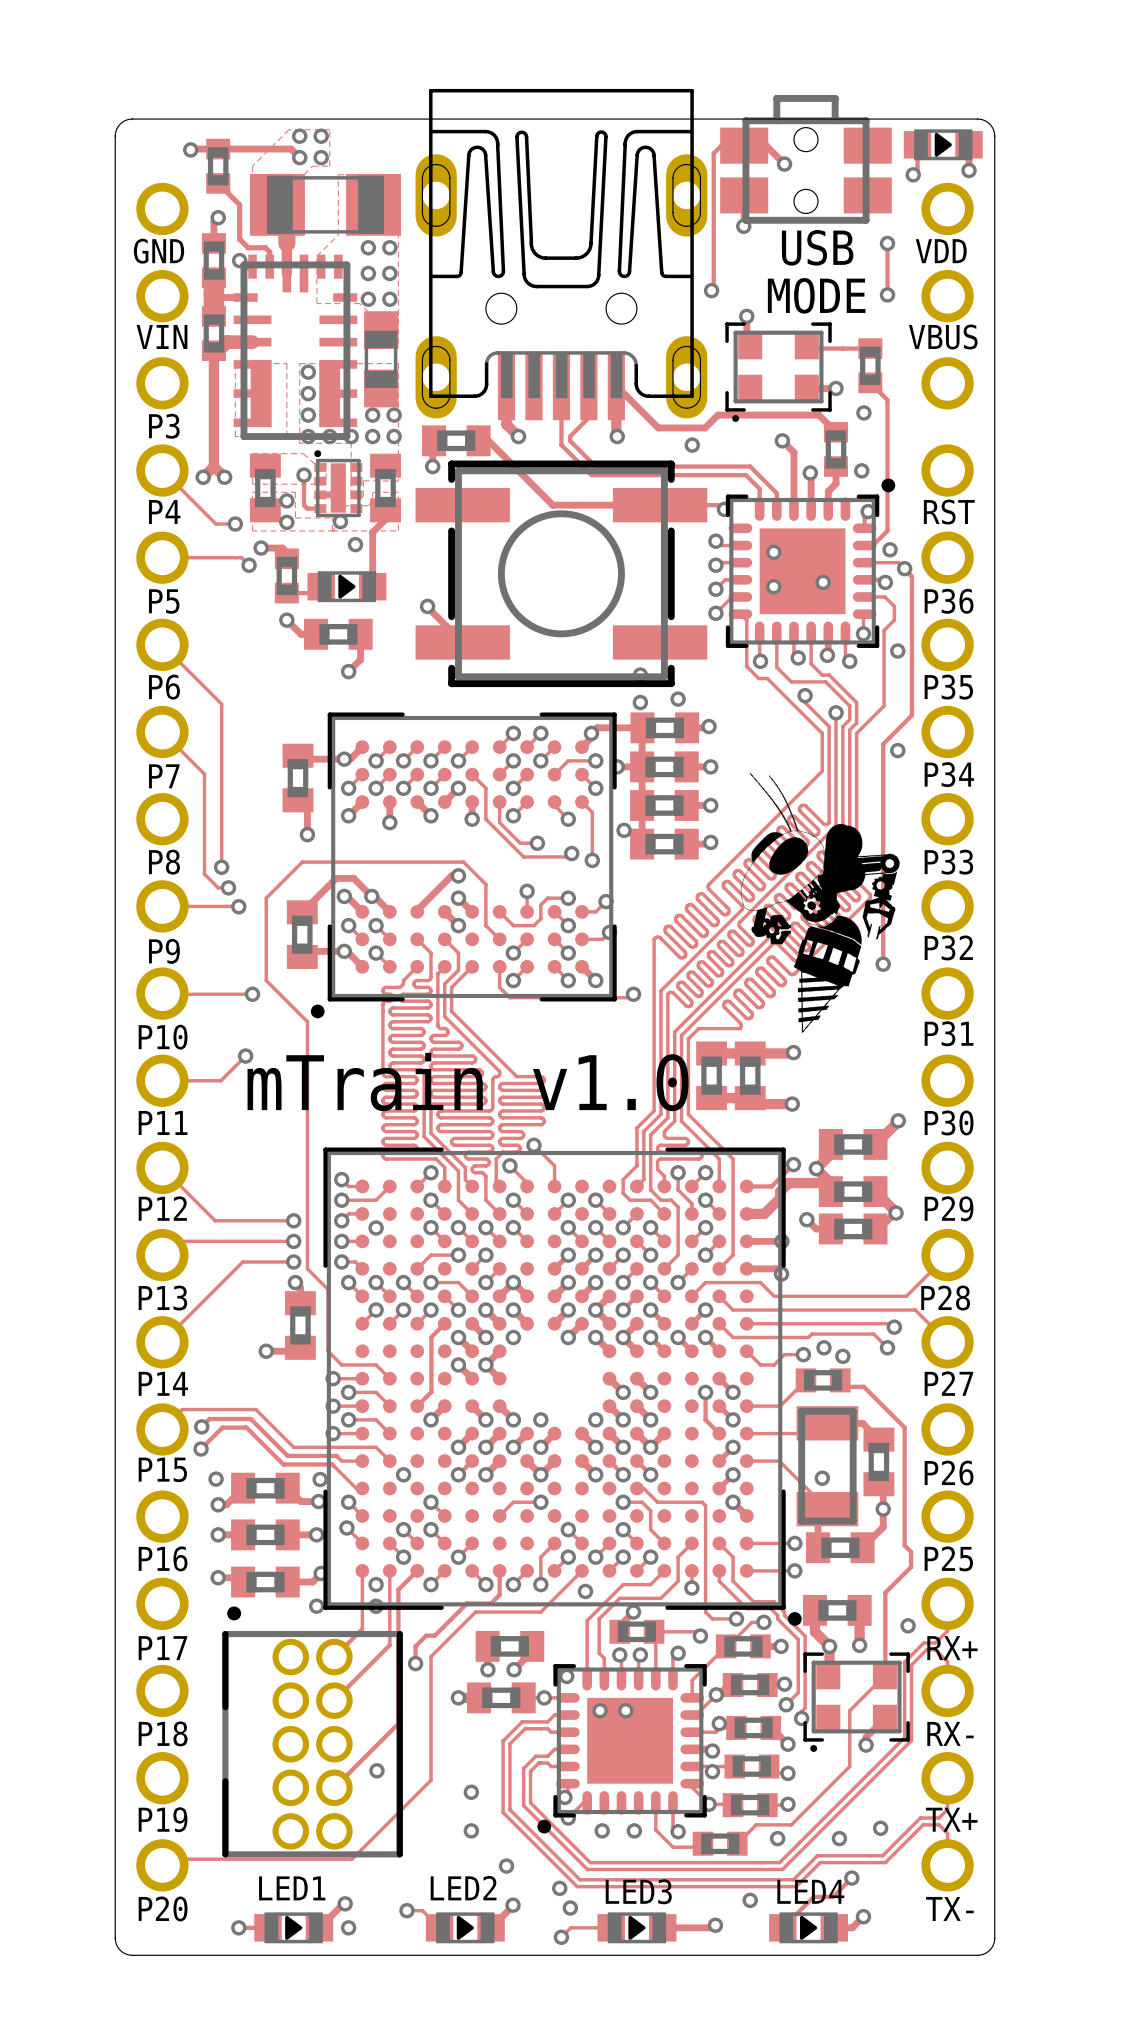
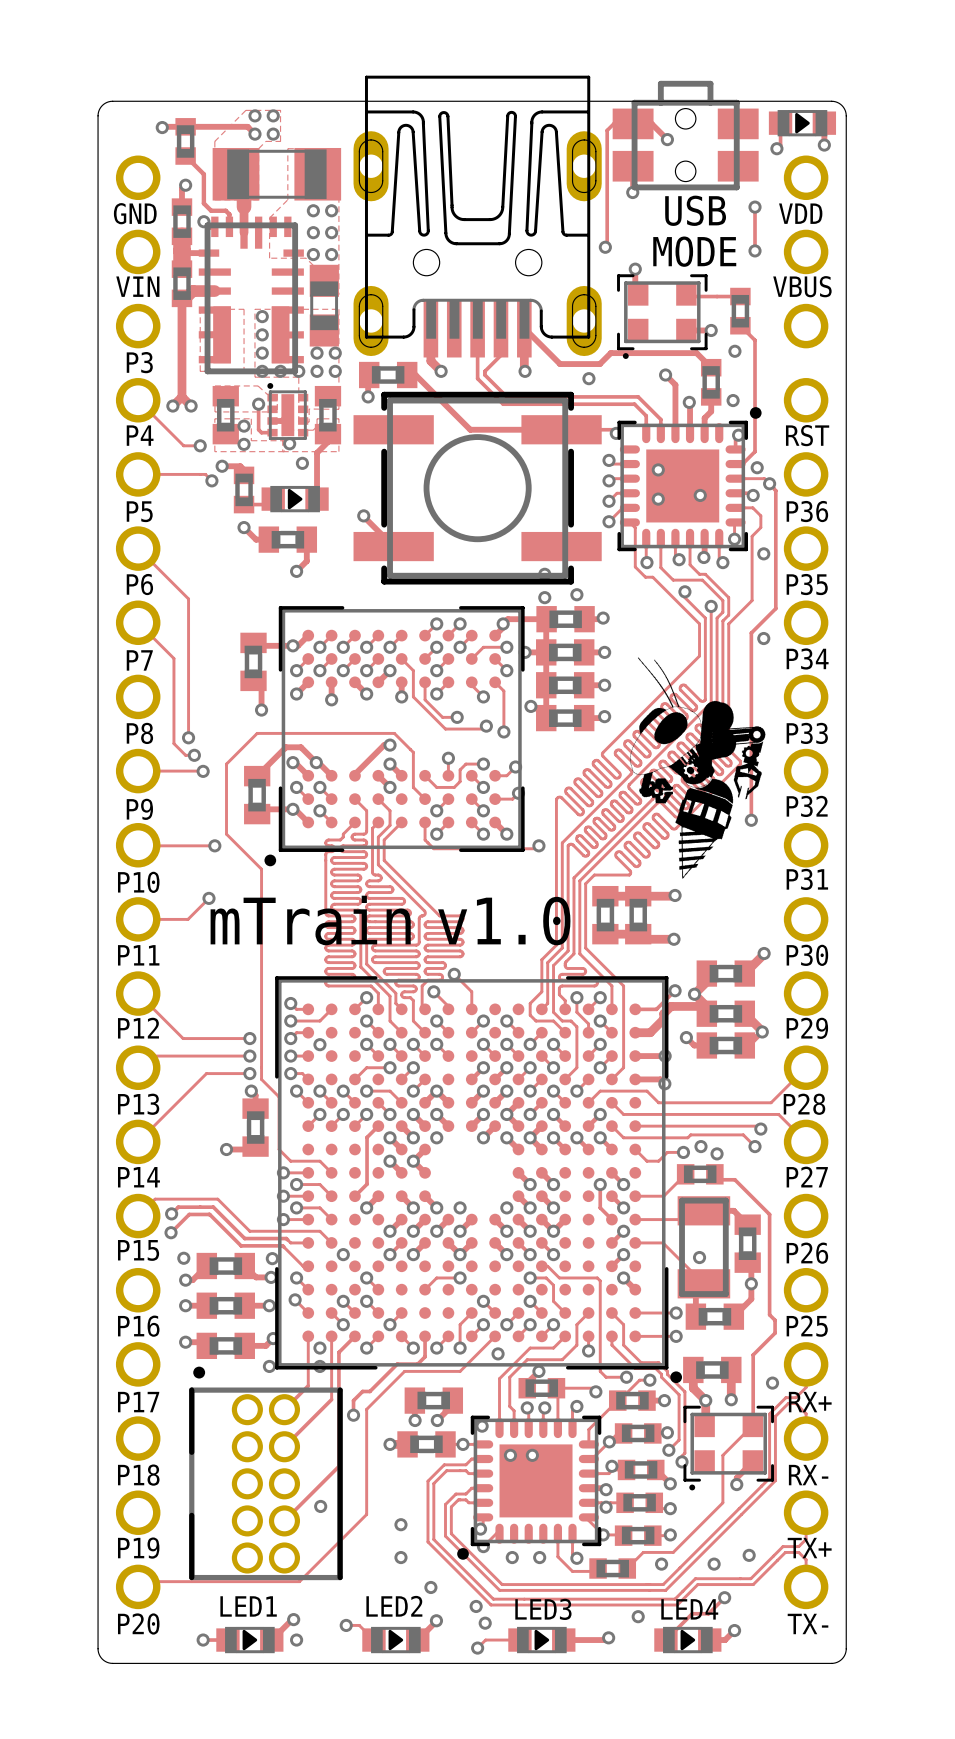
text: mTrain v1.0 (468, 1082) -> mTrain (310, 920)
text: none -> v1.0 (504, 921)

